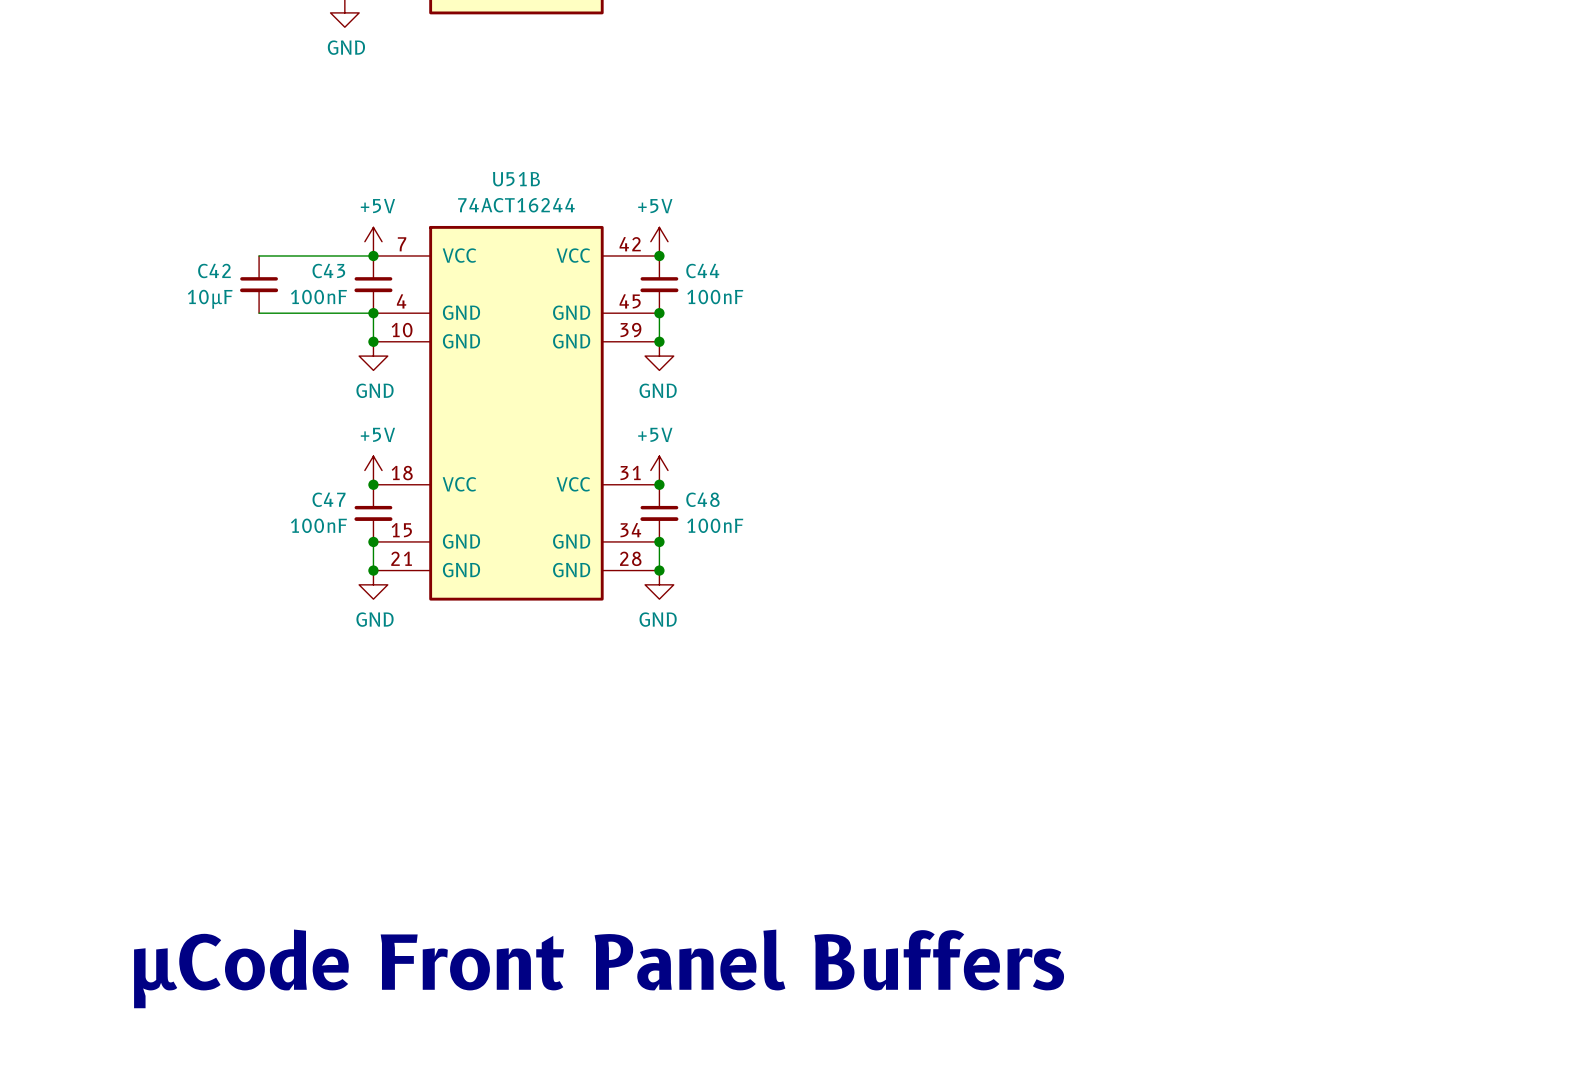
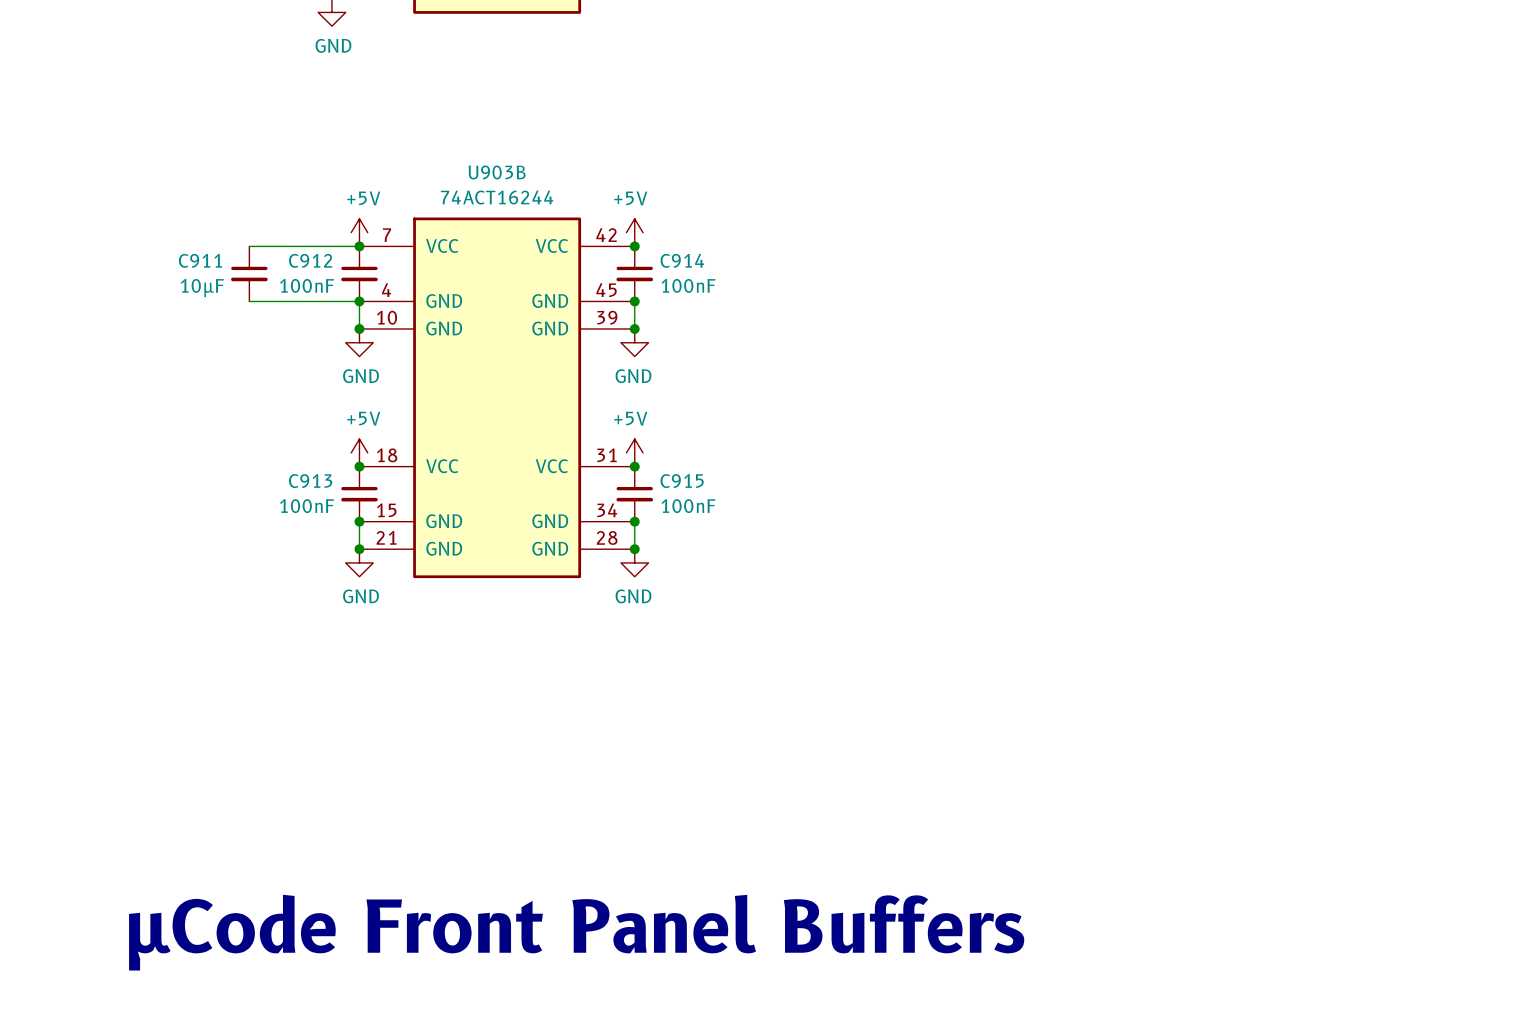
U51B name: U51B (516, 179) -> U903B (497, 172)
C42 name: C42 (214, 270) -> C911 (200, 260)
C43 name: C43 (328, 270) -> C912 (310, 260)
C44 name: C44 (702, 270) -> C914 (682, 260)
C47 name: C47 (329, 499) -> C913 (310, 481)
C48 name: C48 (702, 499) -> C915 (682, 481)

